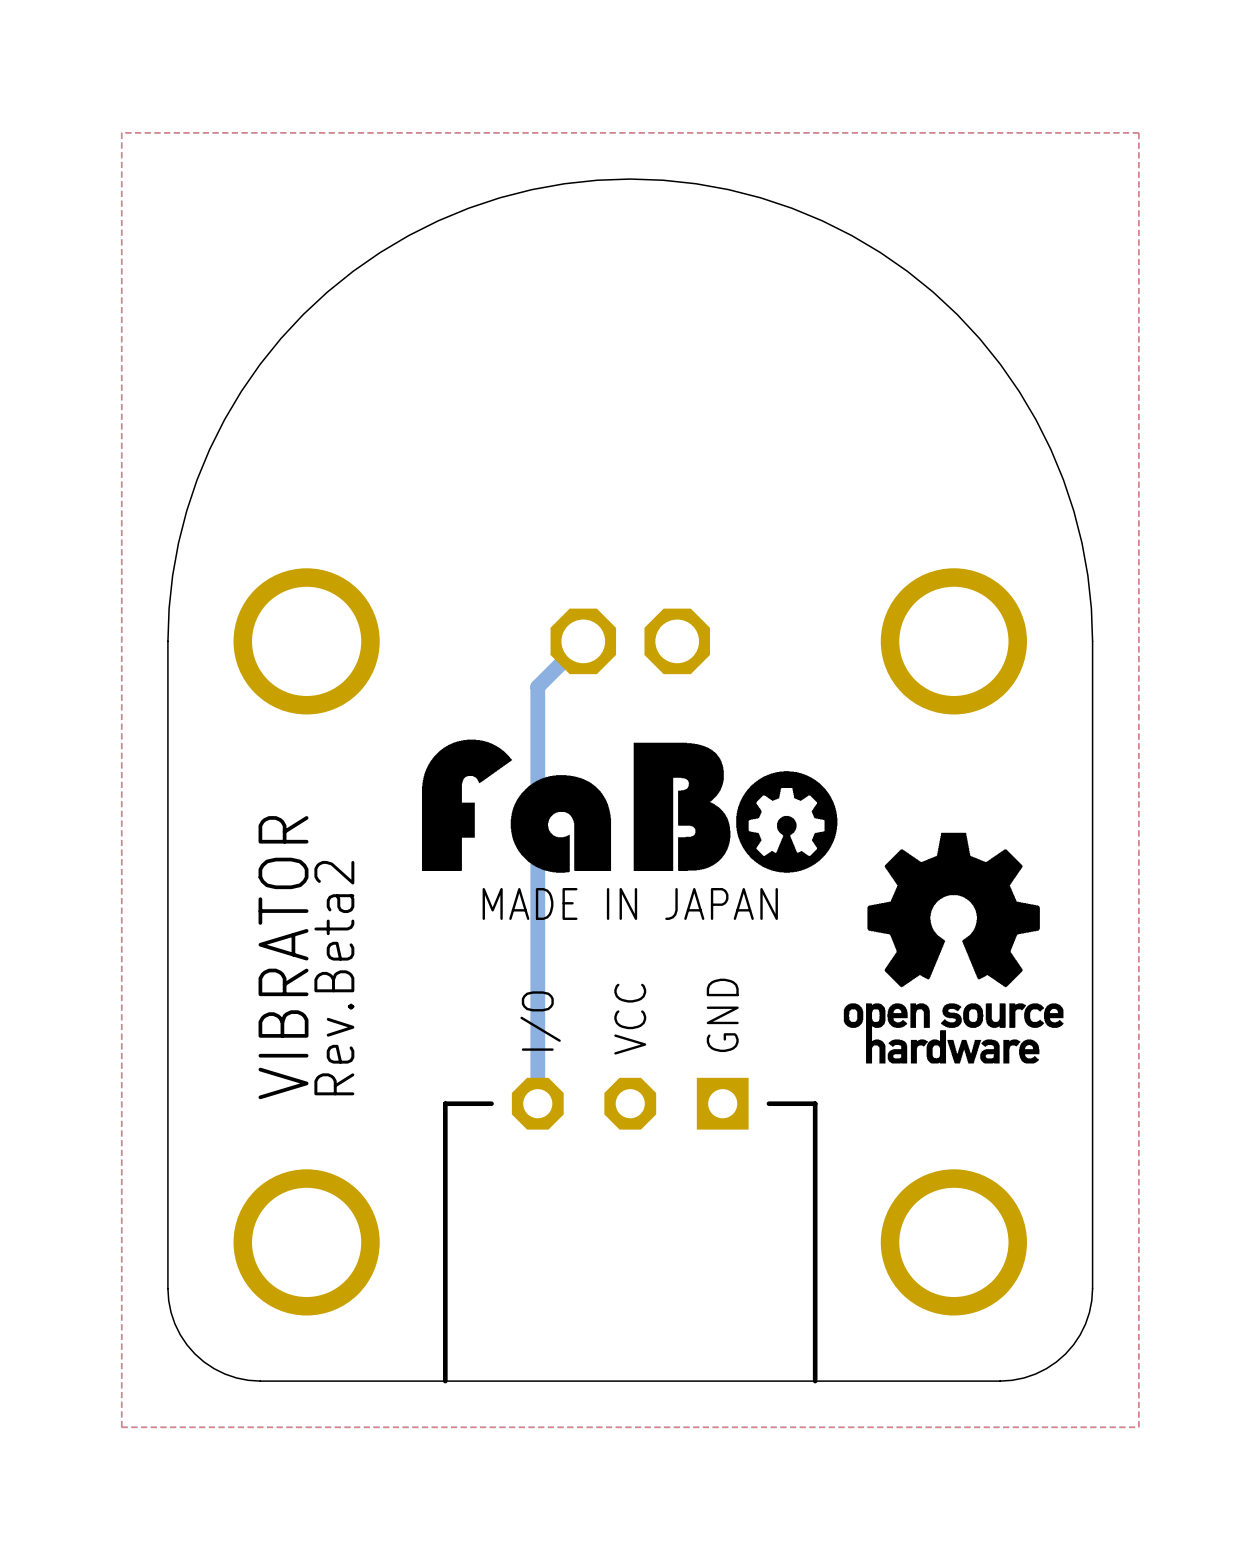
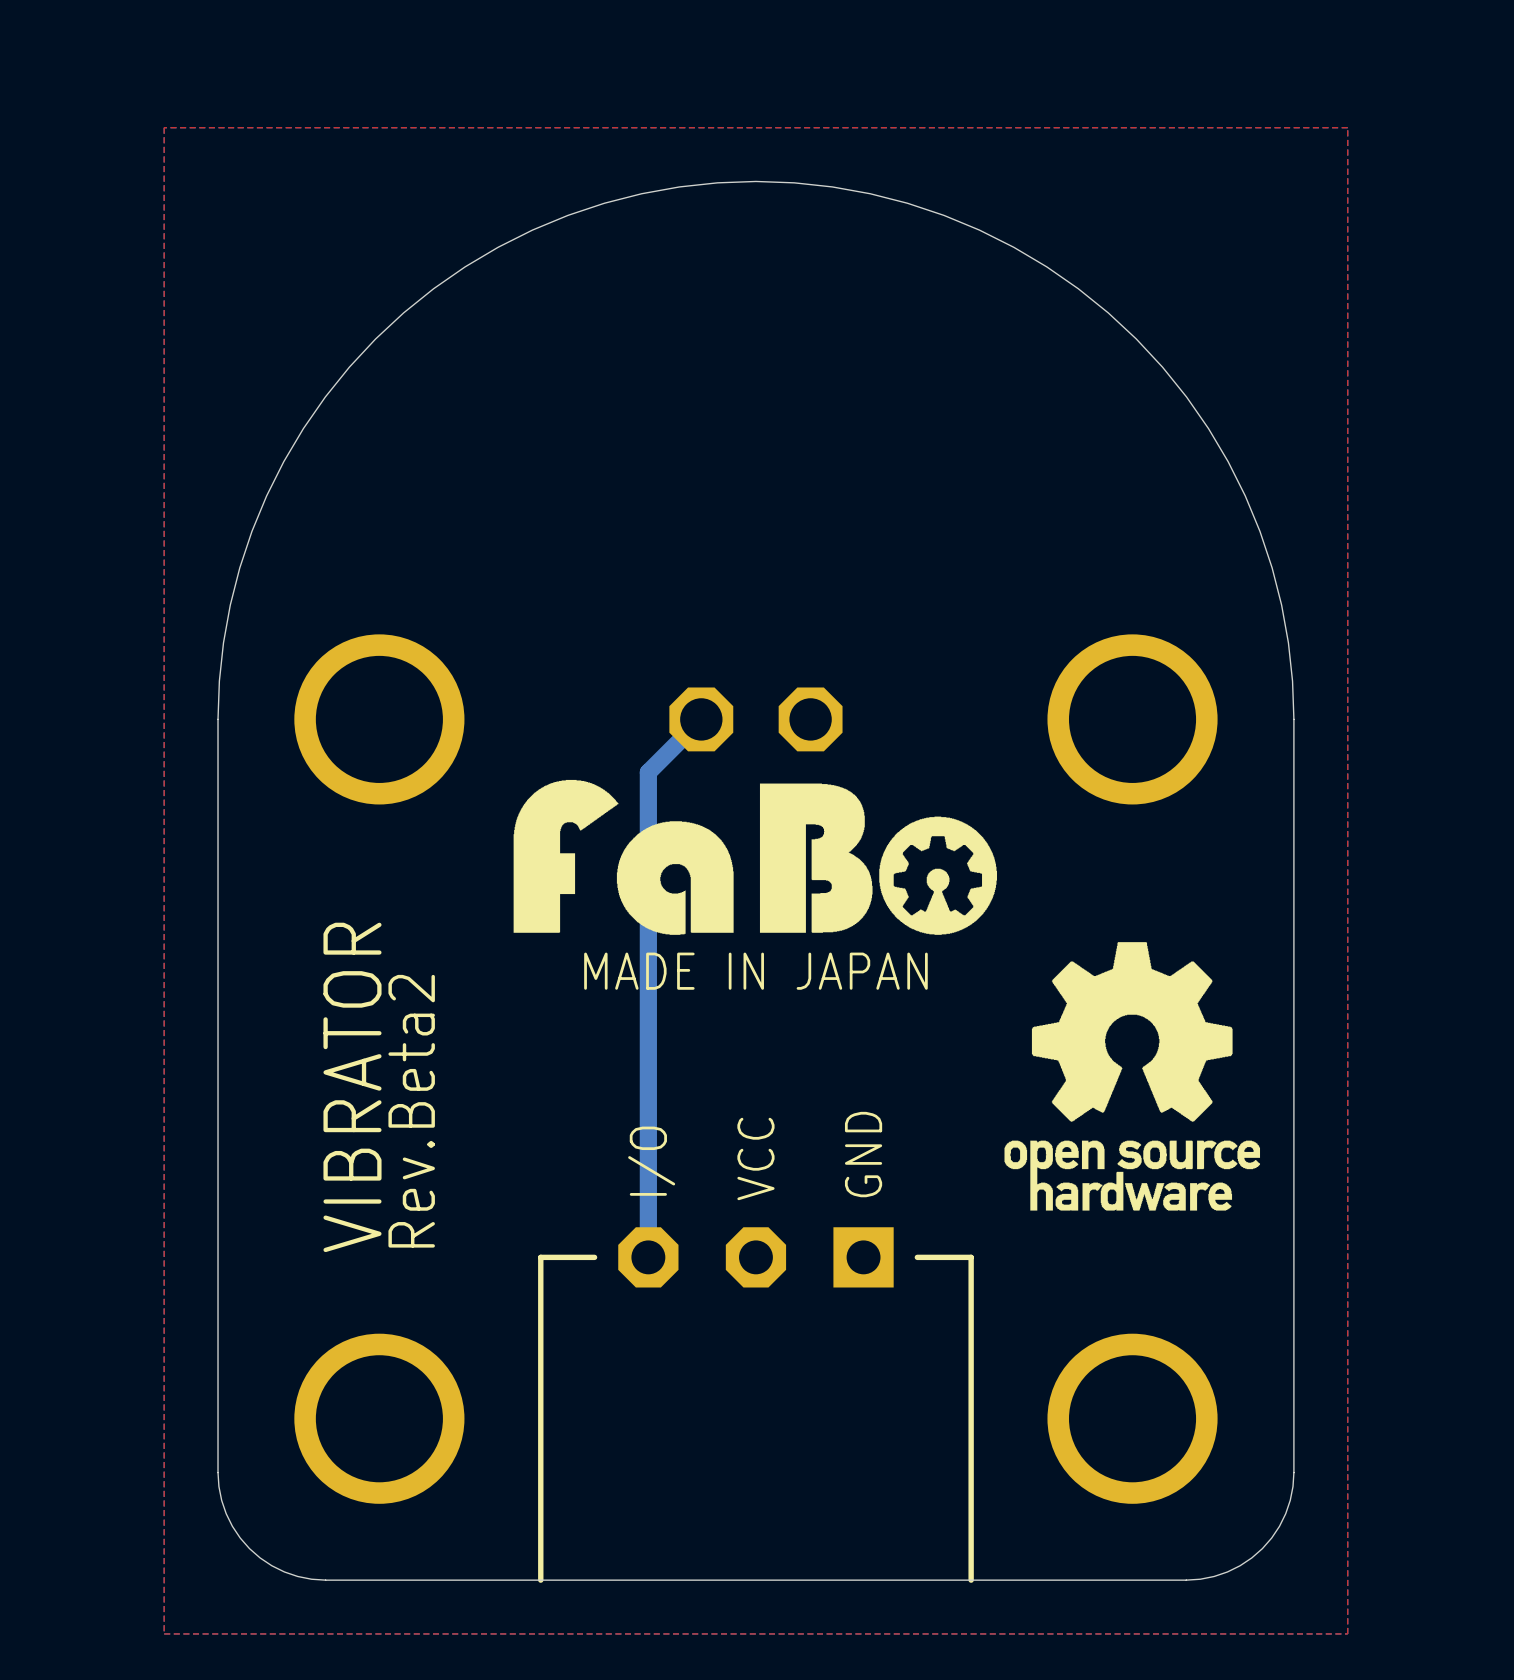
part footprint: [550, 608, 710, 675] -> [669, 687, 843, 752]
drawing position: (629, 806) -> (755, 857)
text position: MADE IN JAPAN (630, 903) -> MADE IN JAPAN (755, 971)

